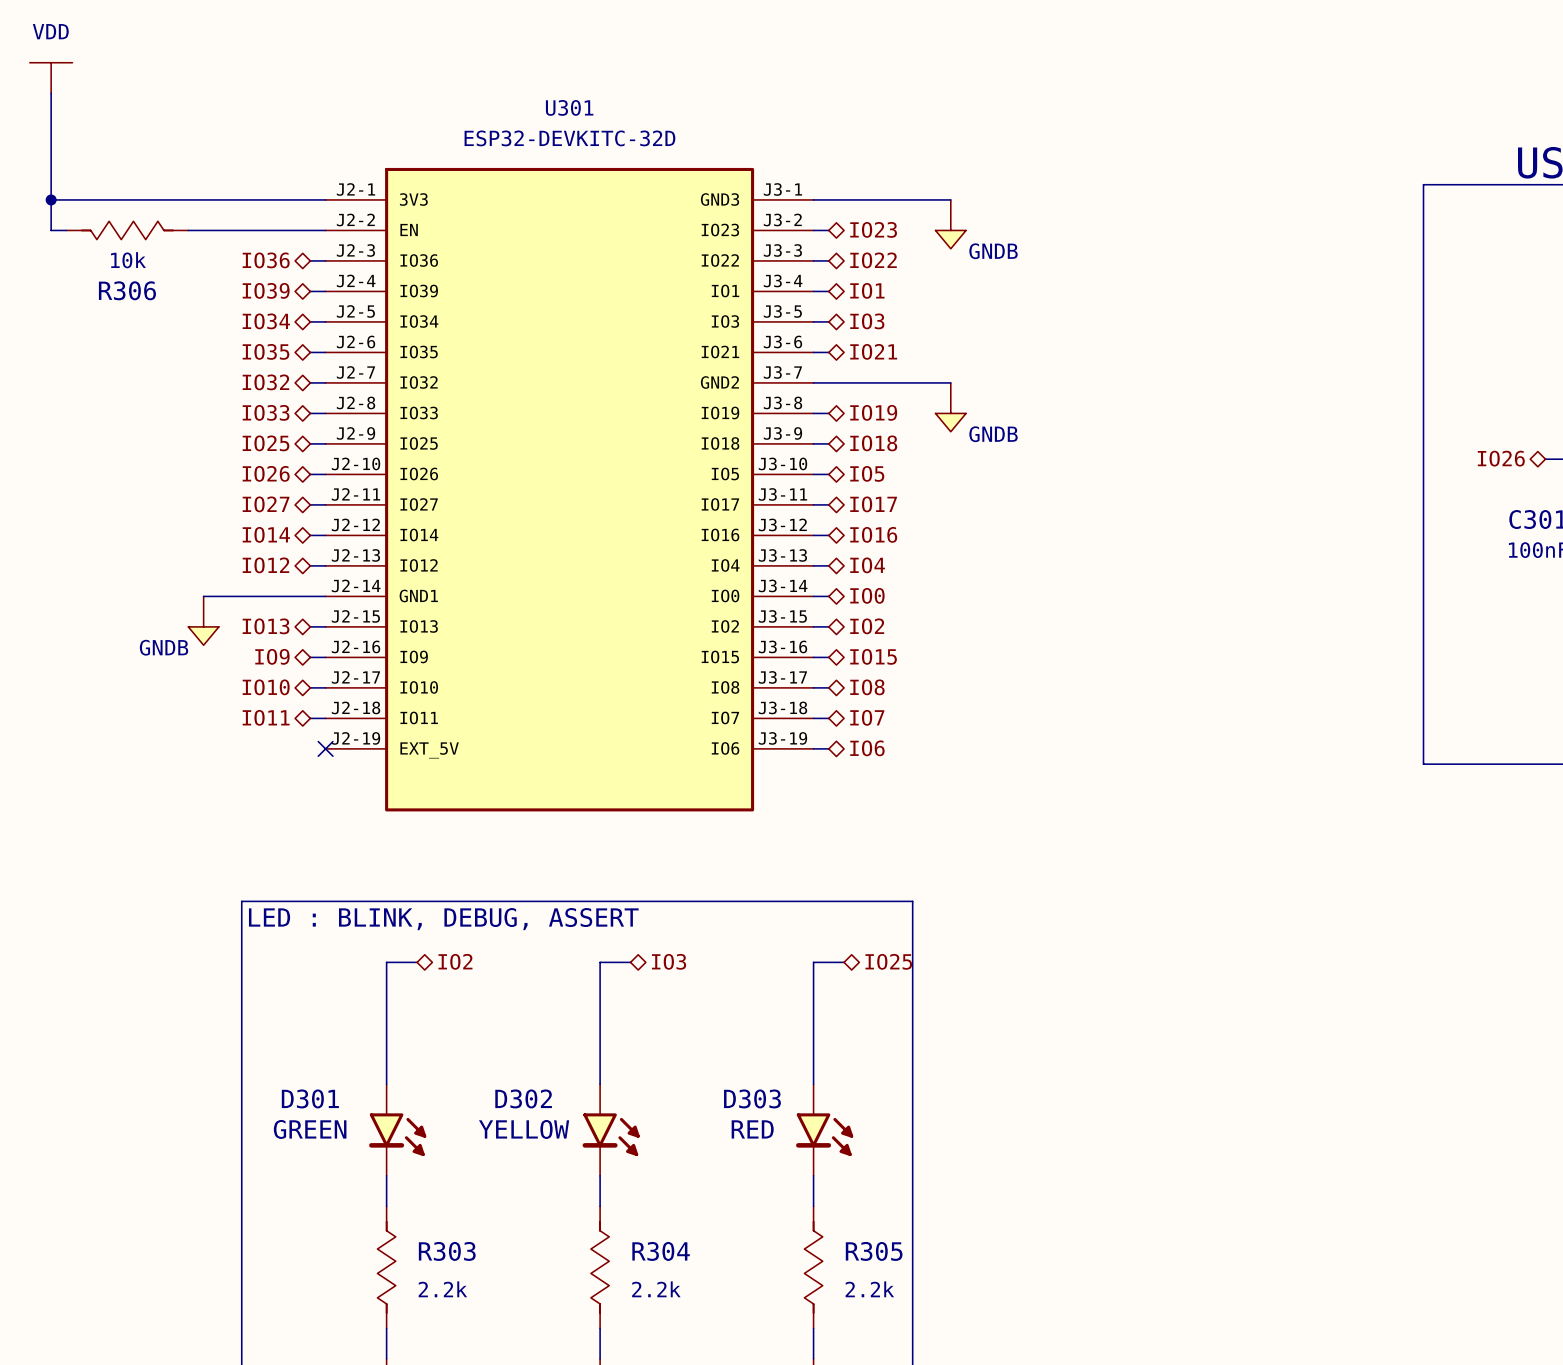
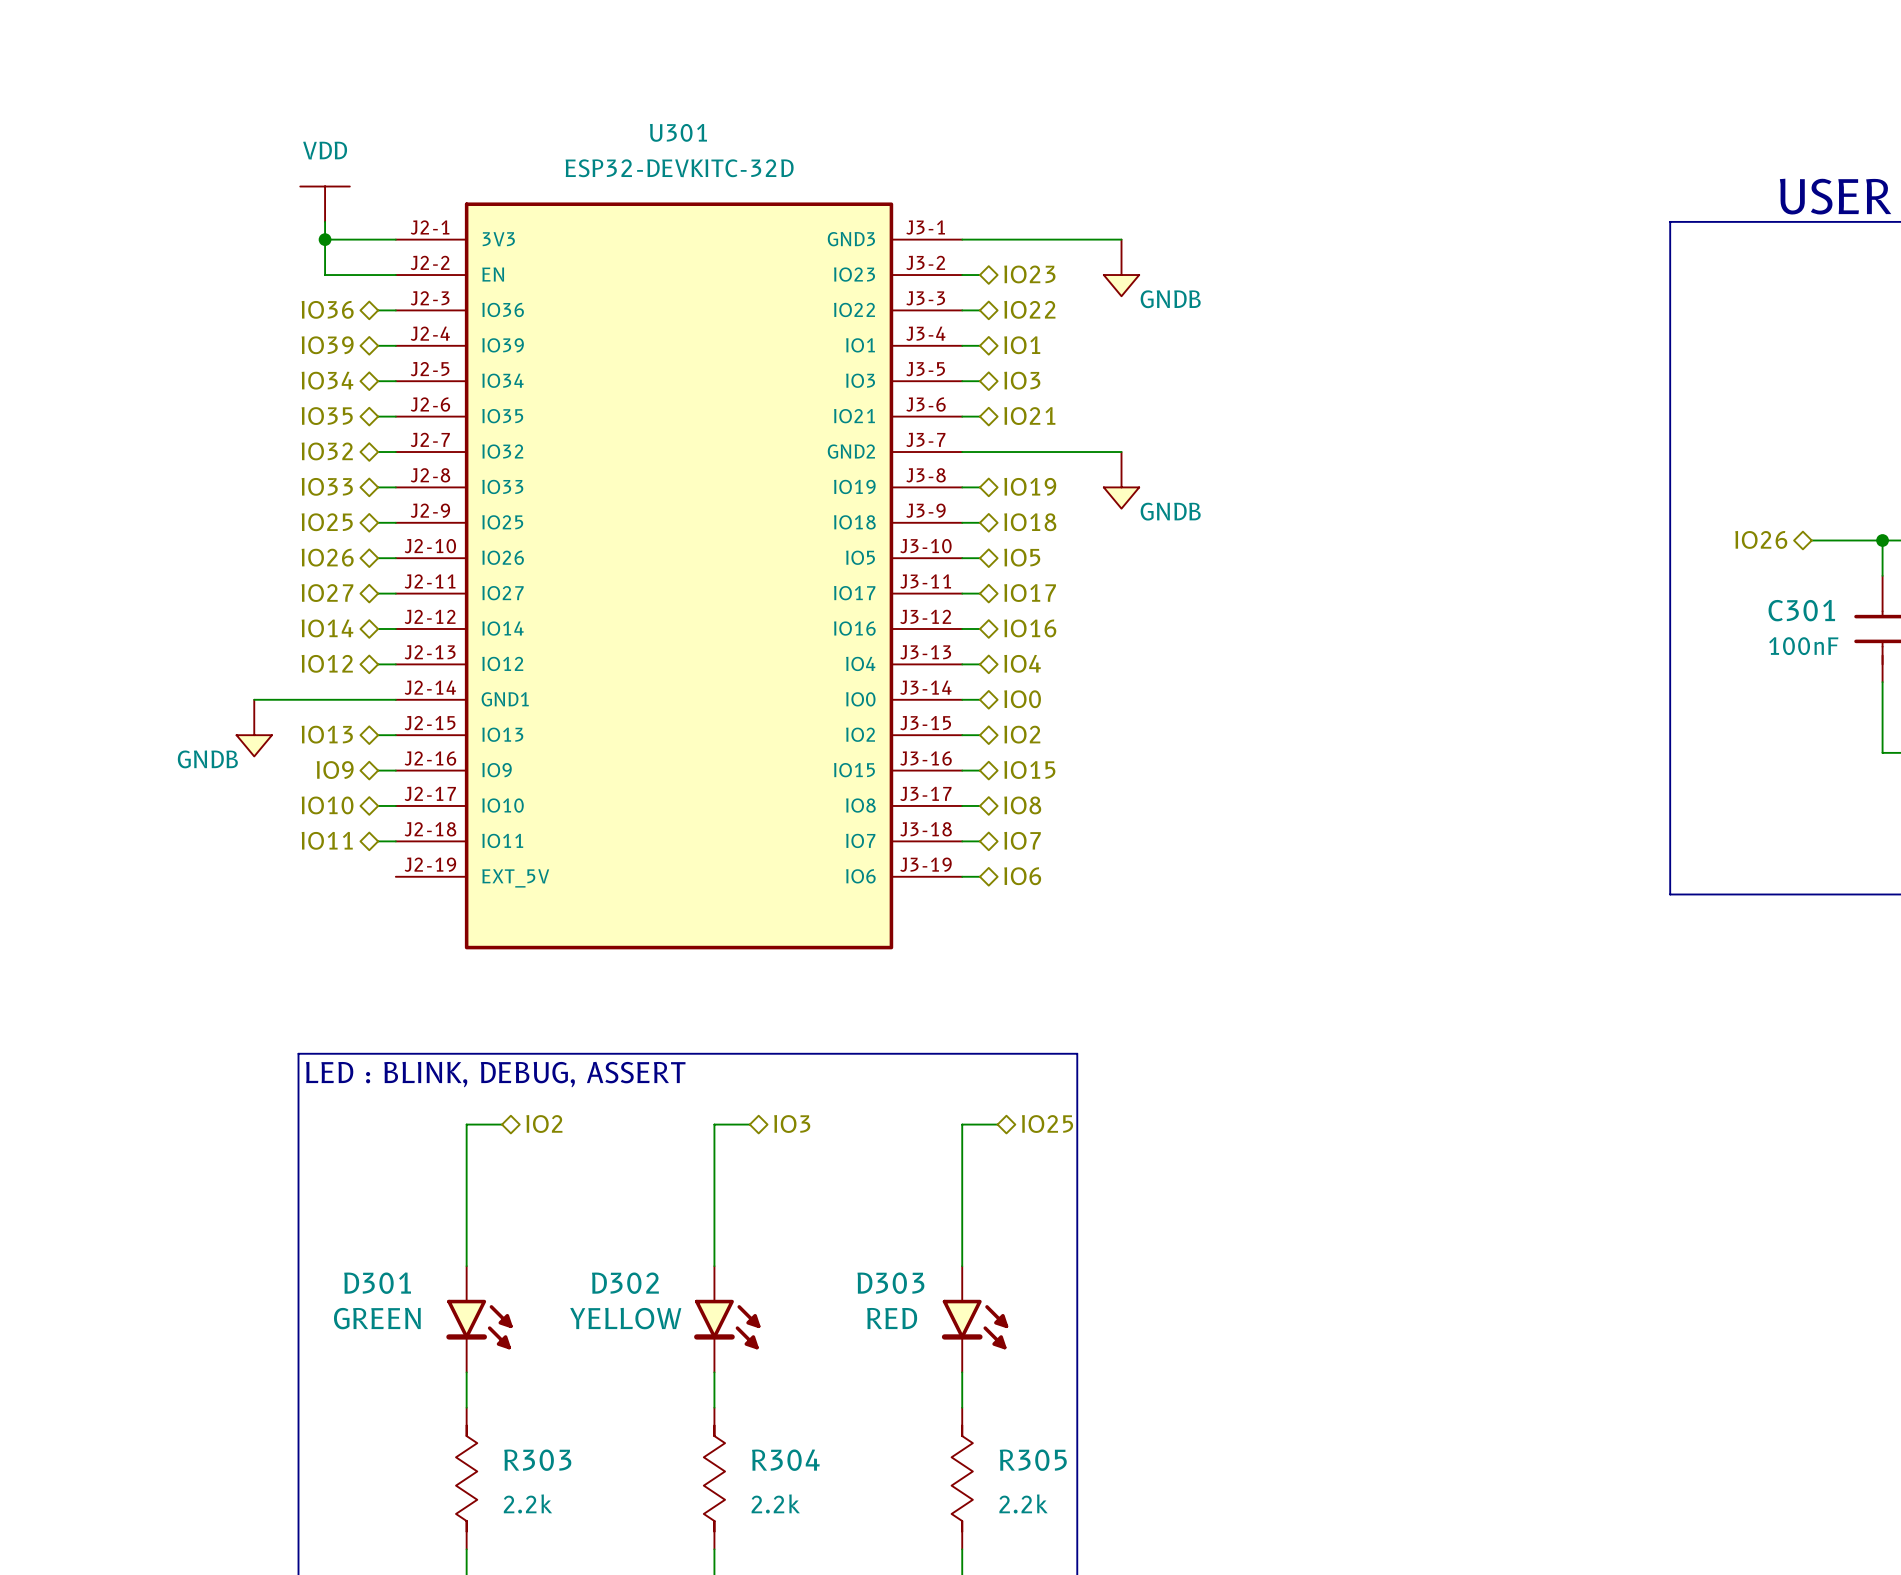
power symbol position: VDD (51, 77) -> VDD (325, 204)
wire: (51, 93) (51, 230) (66, 230) -> none
wire: (51, 199) (264, 199) -> none
junction: (51, 199) -> none
junction: none -> (325, 239)
R306: (127, 230) -> none
wire: (188, 230) (264, 230) -> (325, 221) (325, 275)
no-connect mark: (325, 748) -> none

